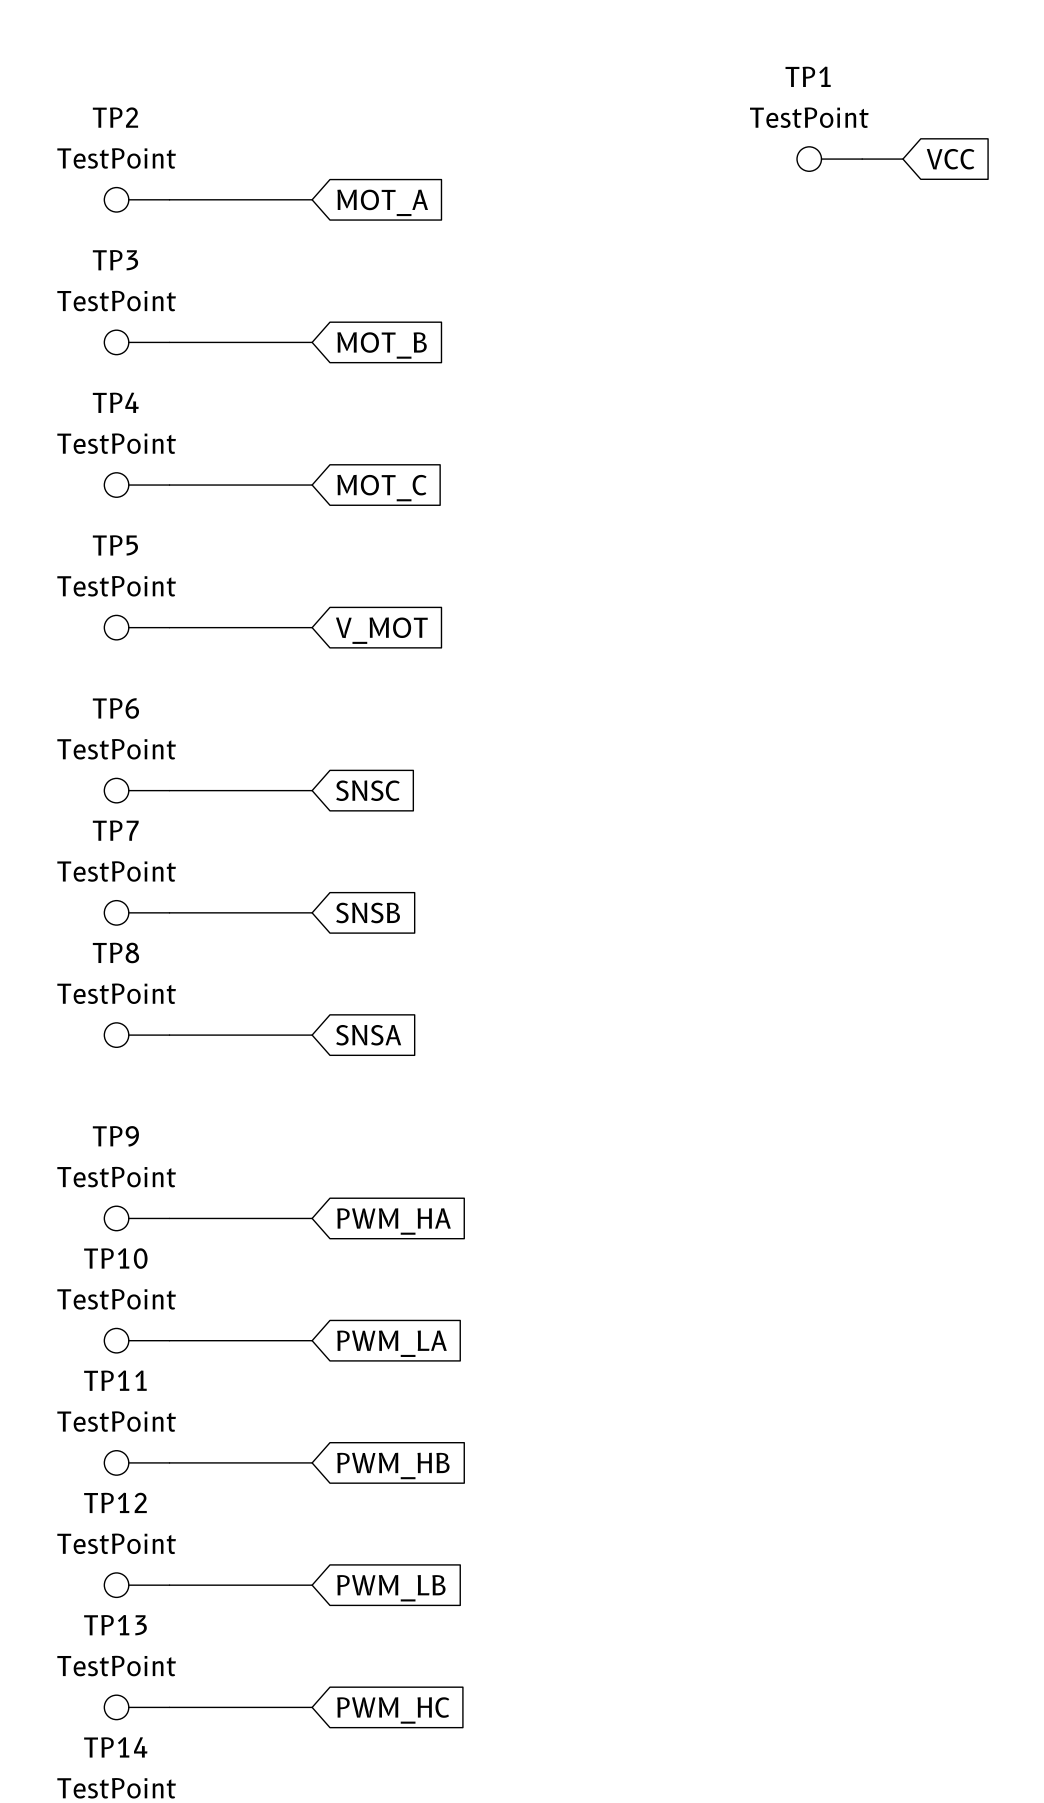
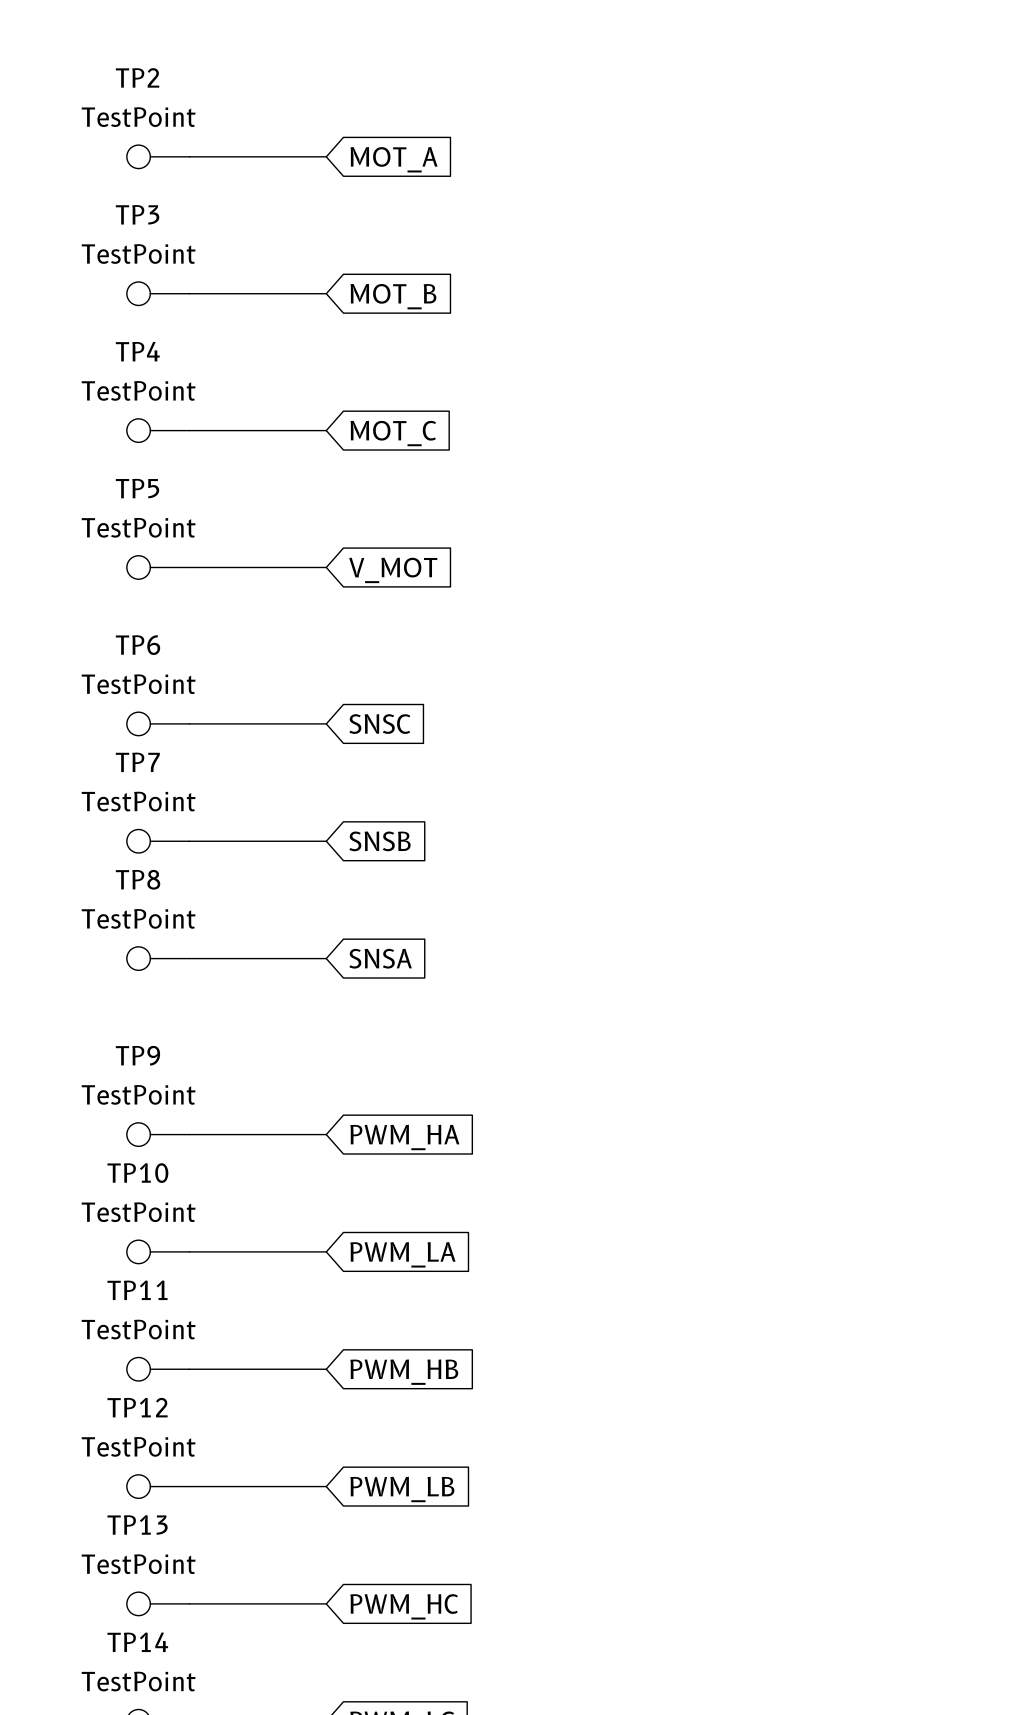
TP1: TestPoint (829, 159) -> none
wire: (862, 159) (902, 159) -> none
global label: VCC (950, 159) -> none

